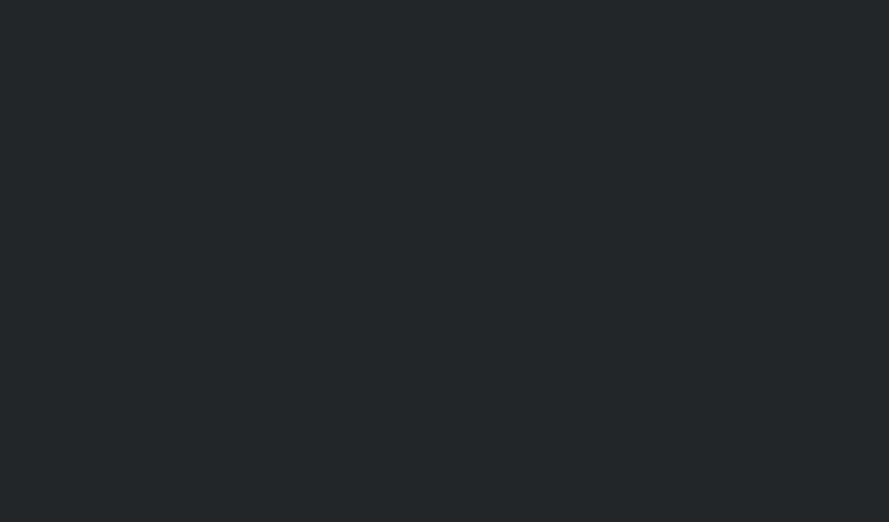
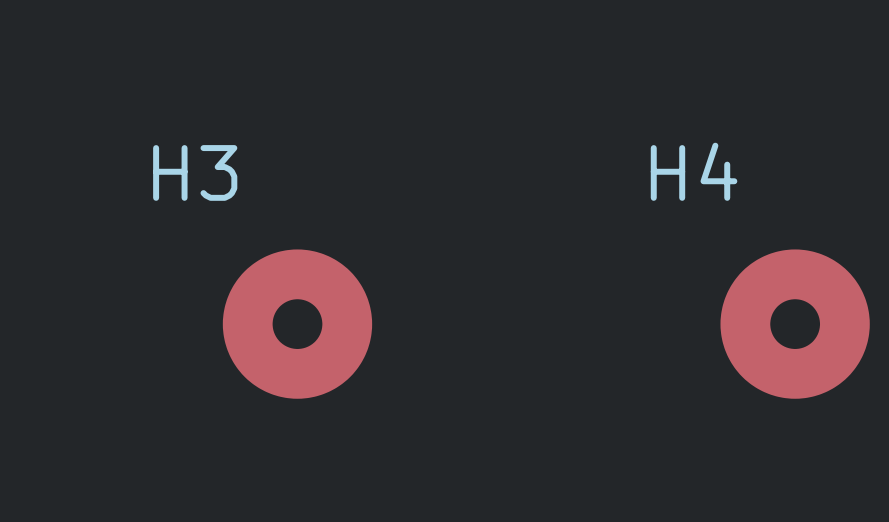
H3: none -> (297, 324)
H4: none -> (795, 324)

